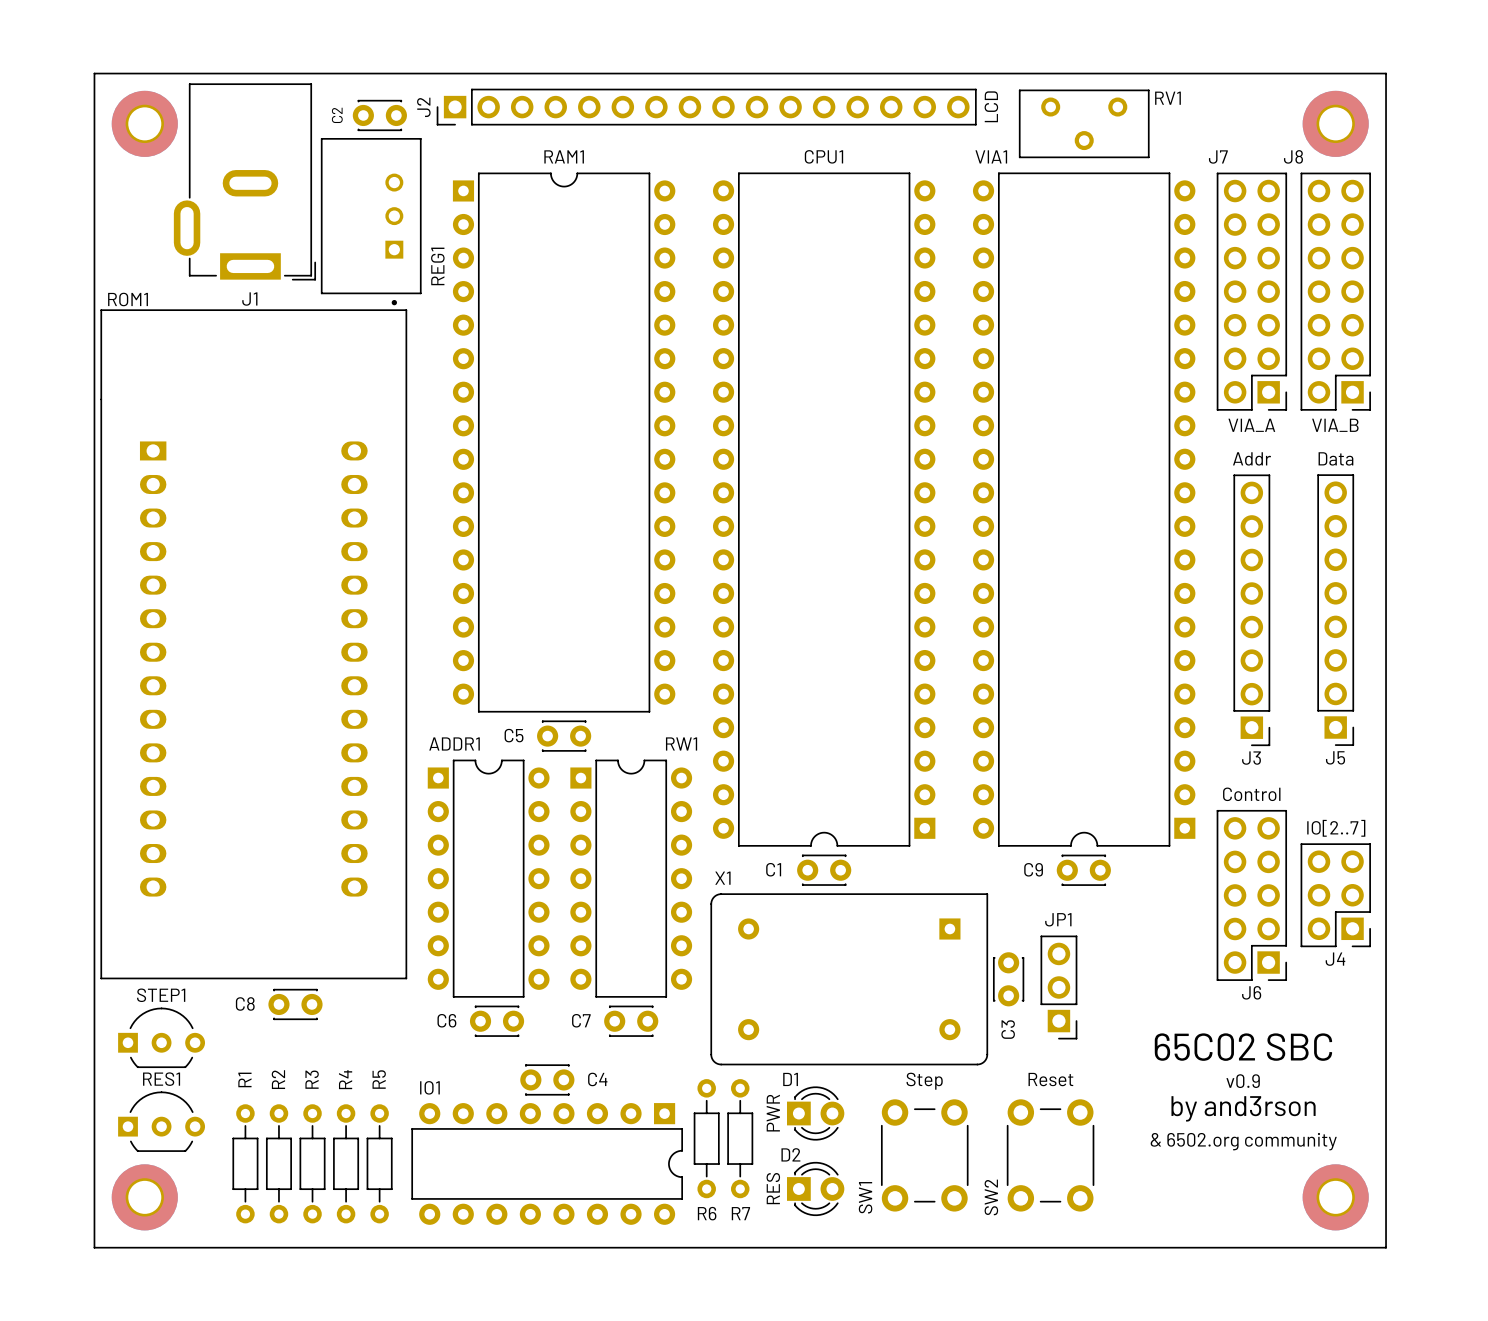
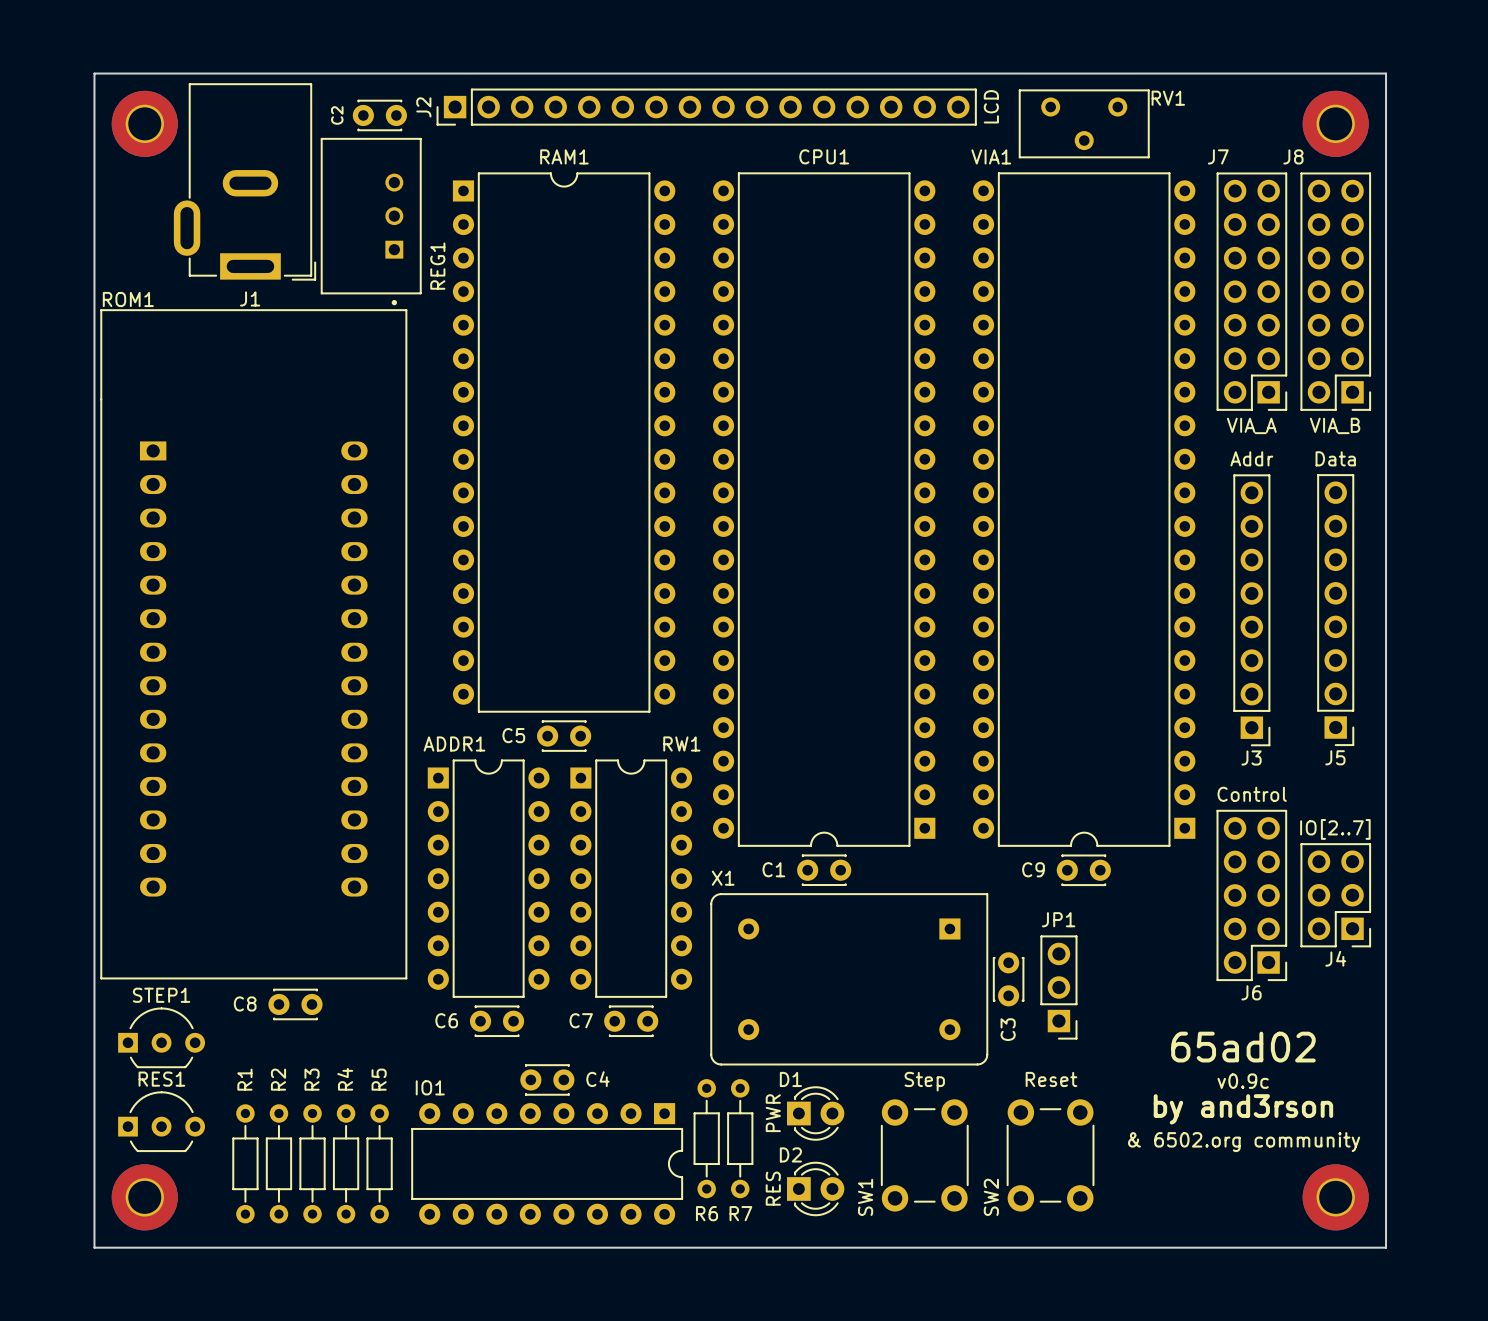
text: 65C02 SBC (1243, 1047) -> 65ad02 (1243, 1047)
text: v0.9 (1243, 1081) -> v0.9c (1243, 1081)

